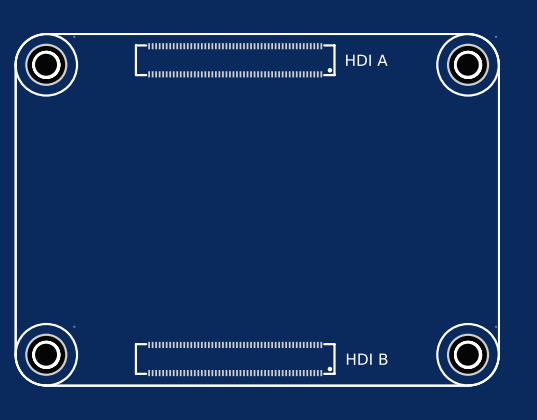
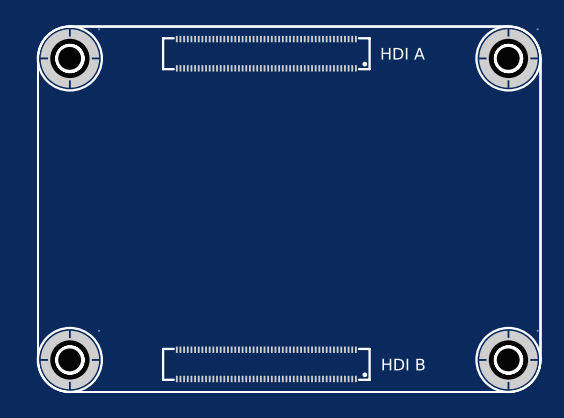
part footprint: [14, 32, 79, 97] -> [36, 25, 104, 92]
part footprint: [436, 32, 500, 97] -> [475, 25, 542, 92]
part footprint: [14, 322, 79, 387] -> [36, 326, 104, 394]
part footprint: [436, 322, 500, 387] -> [475, 326, 542, 394]

